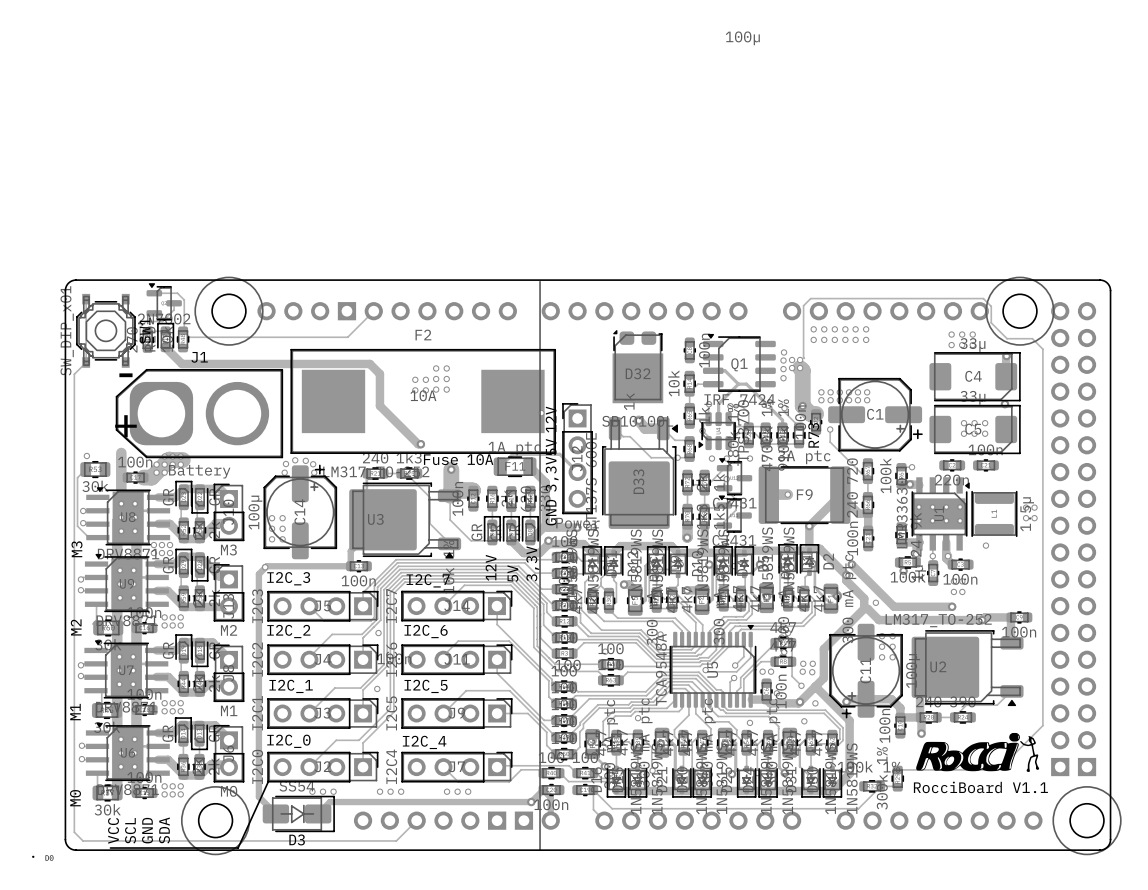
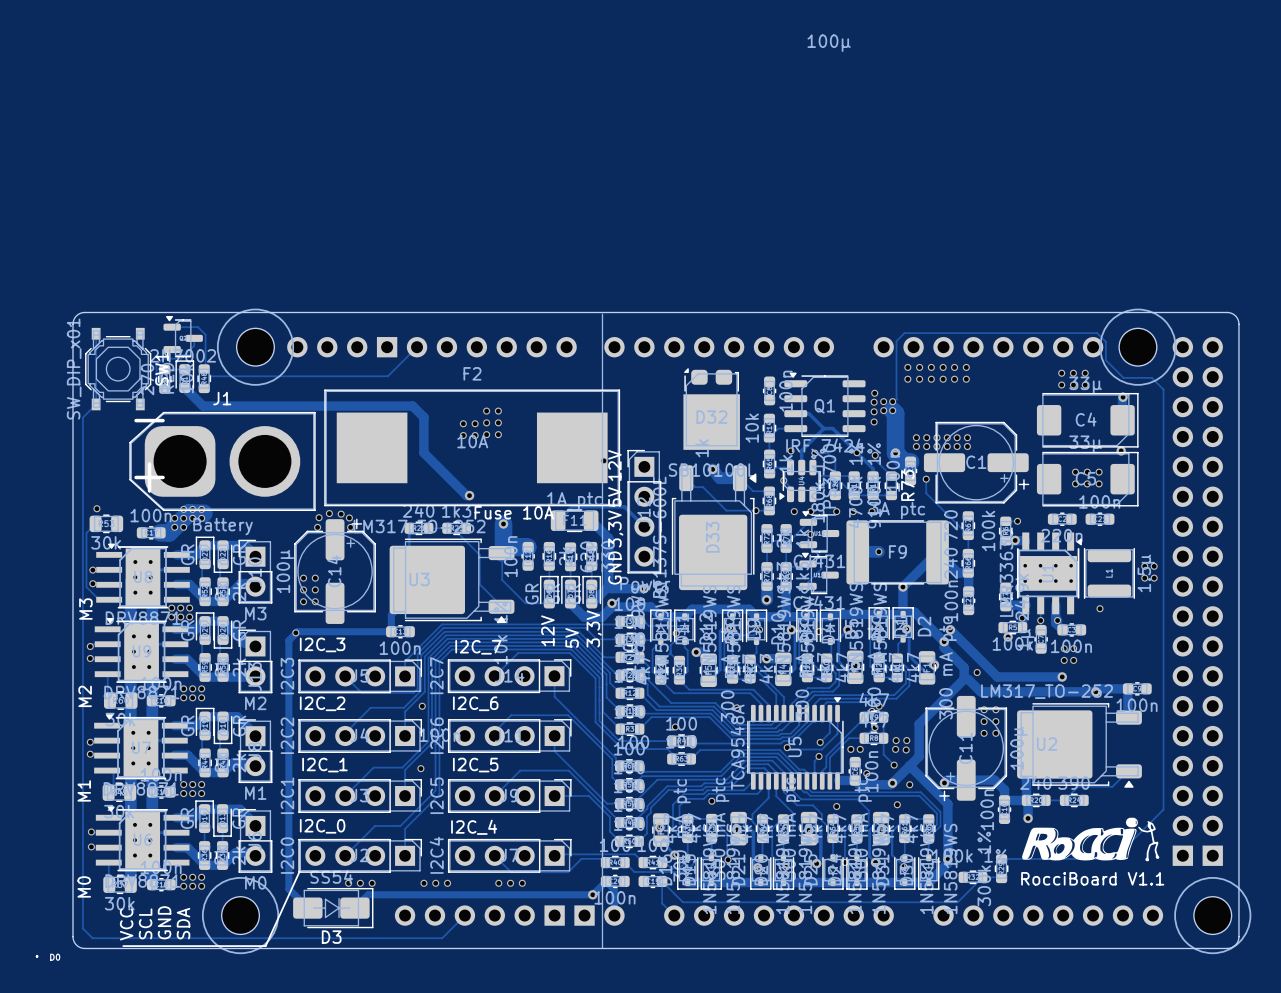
track: (121, 452) (121, 503) -> none

